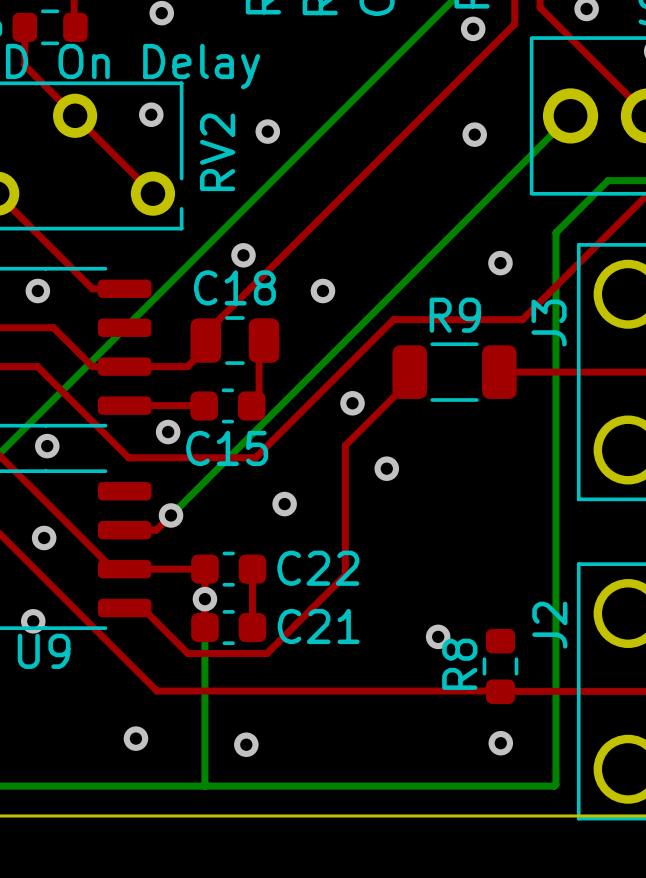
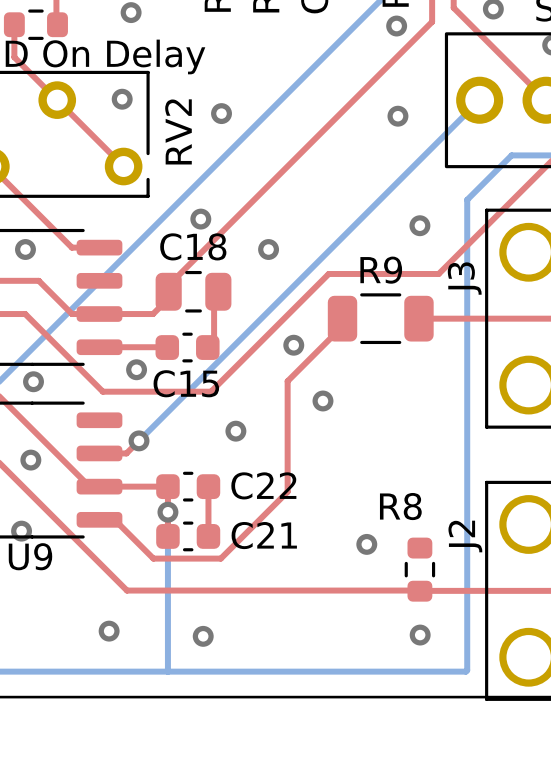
R8 name rotation: 0° (459, 664) -> 90° clockwise (400, 506)

